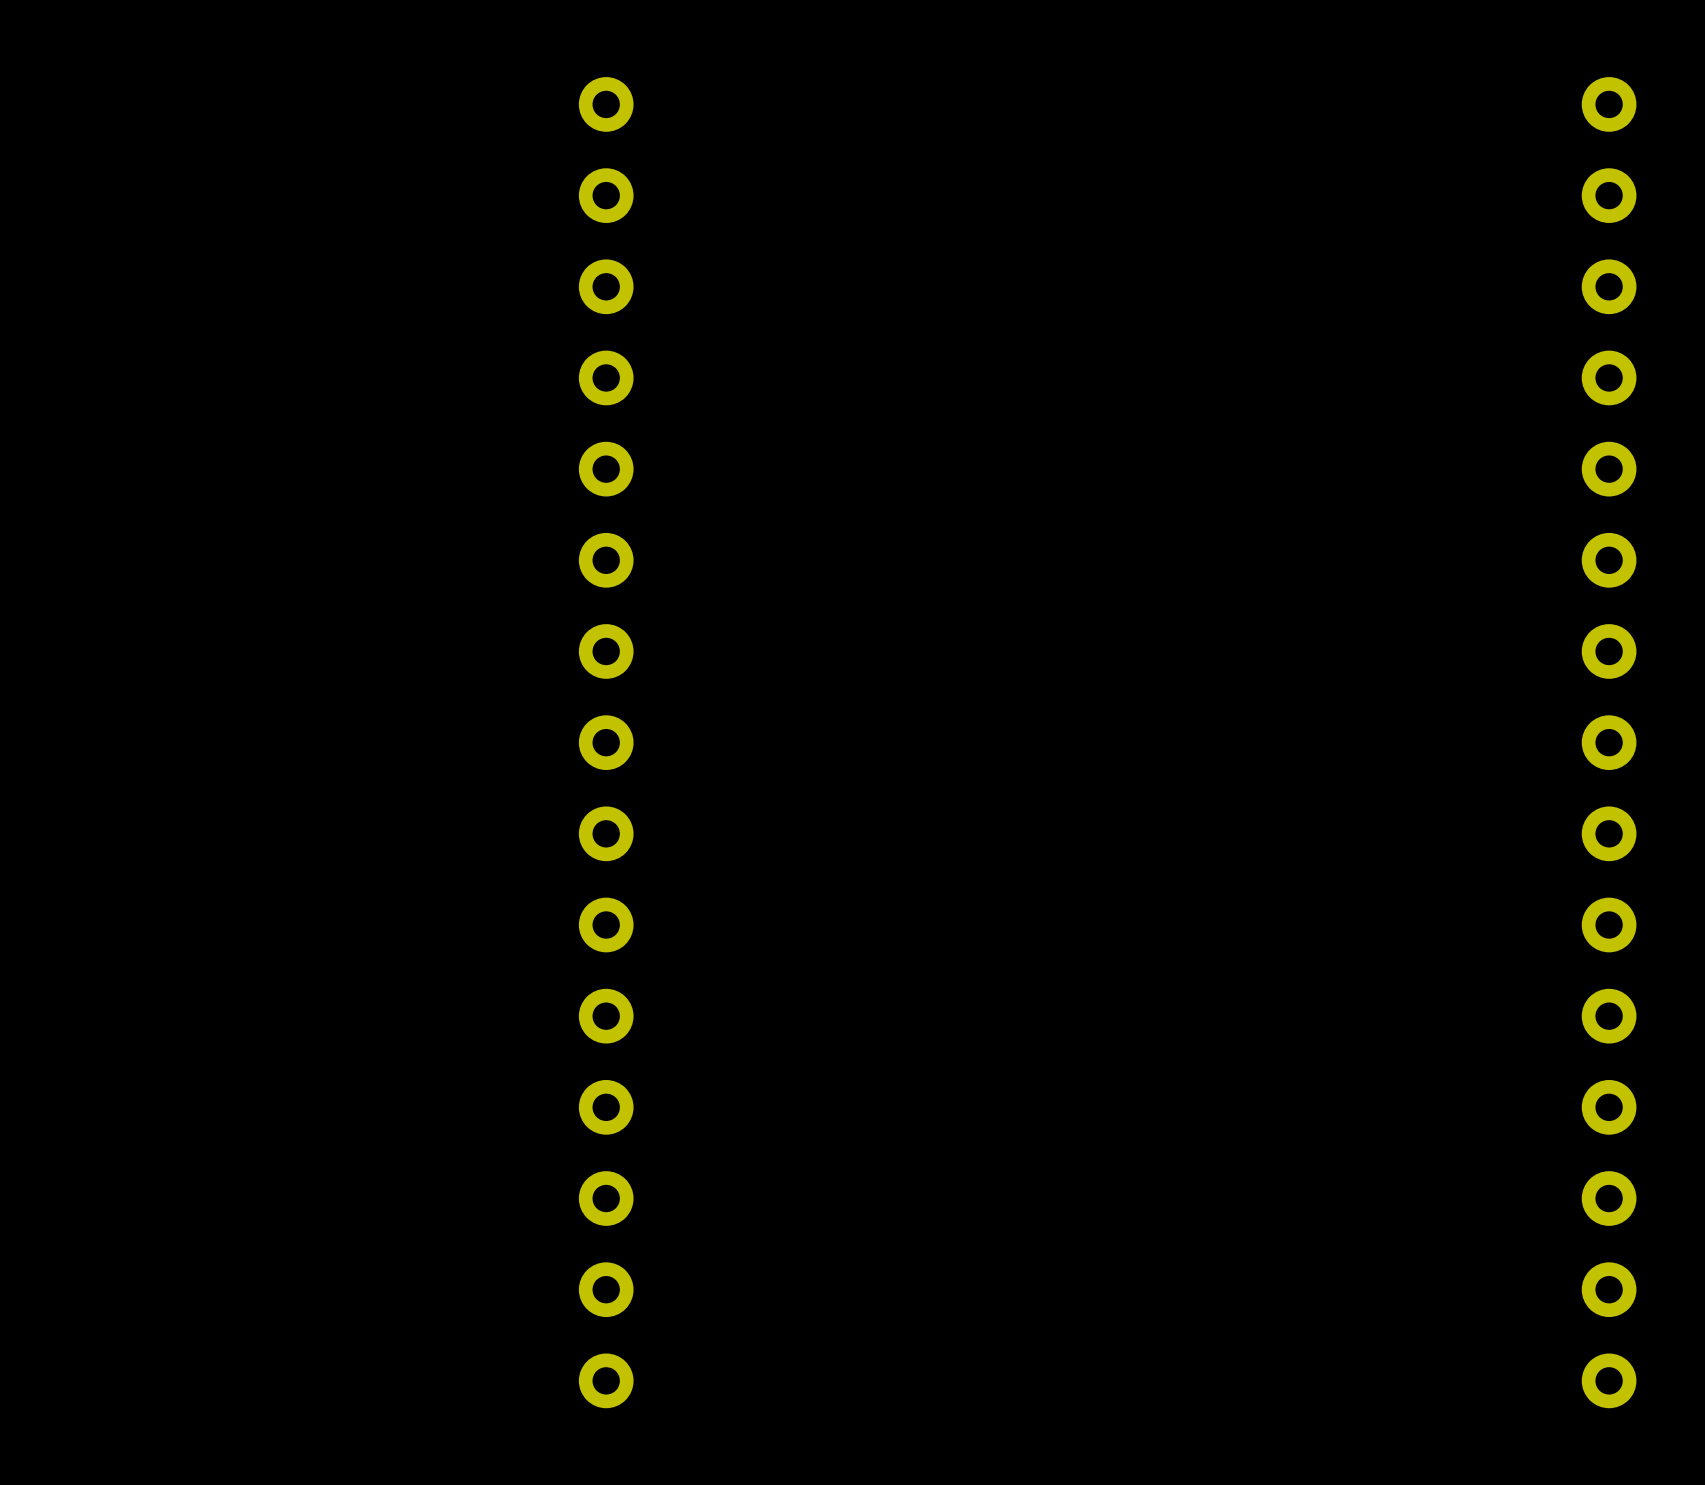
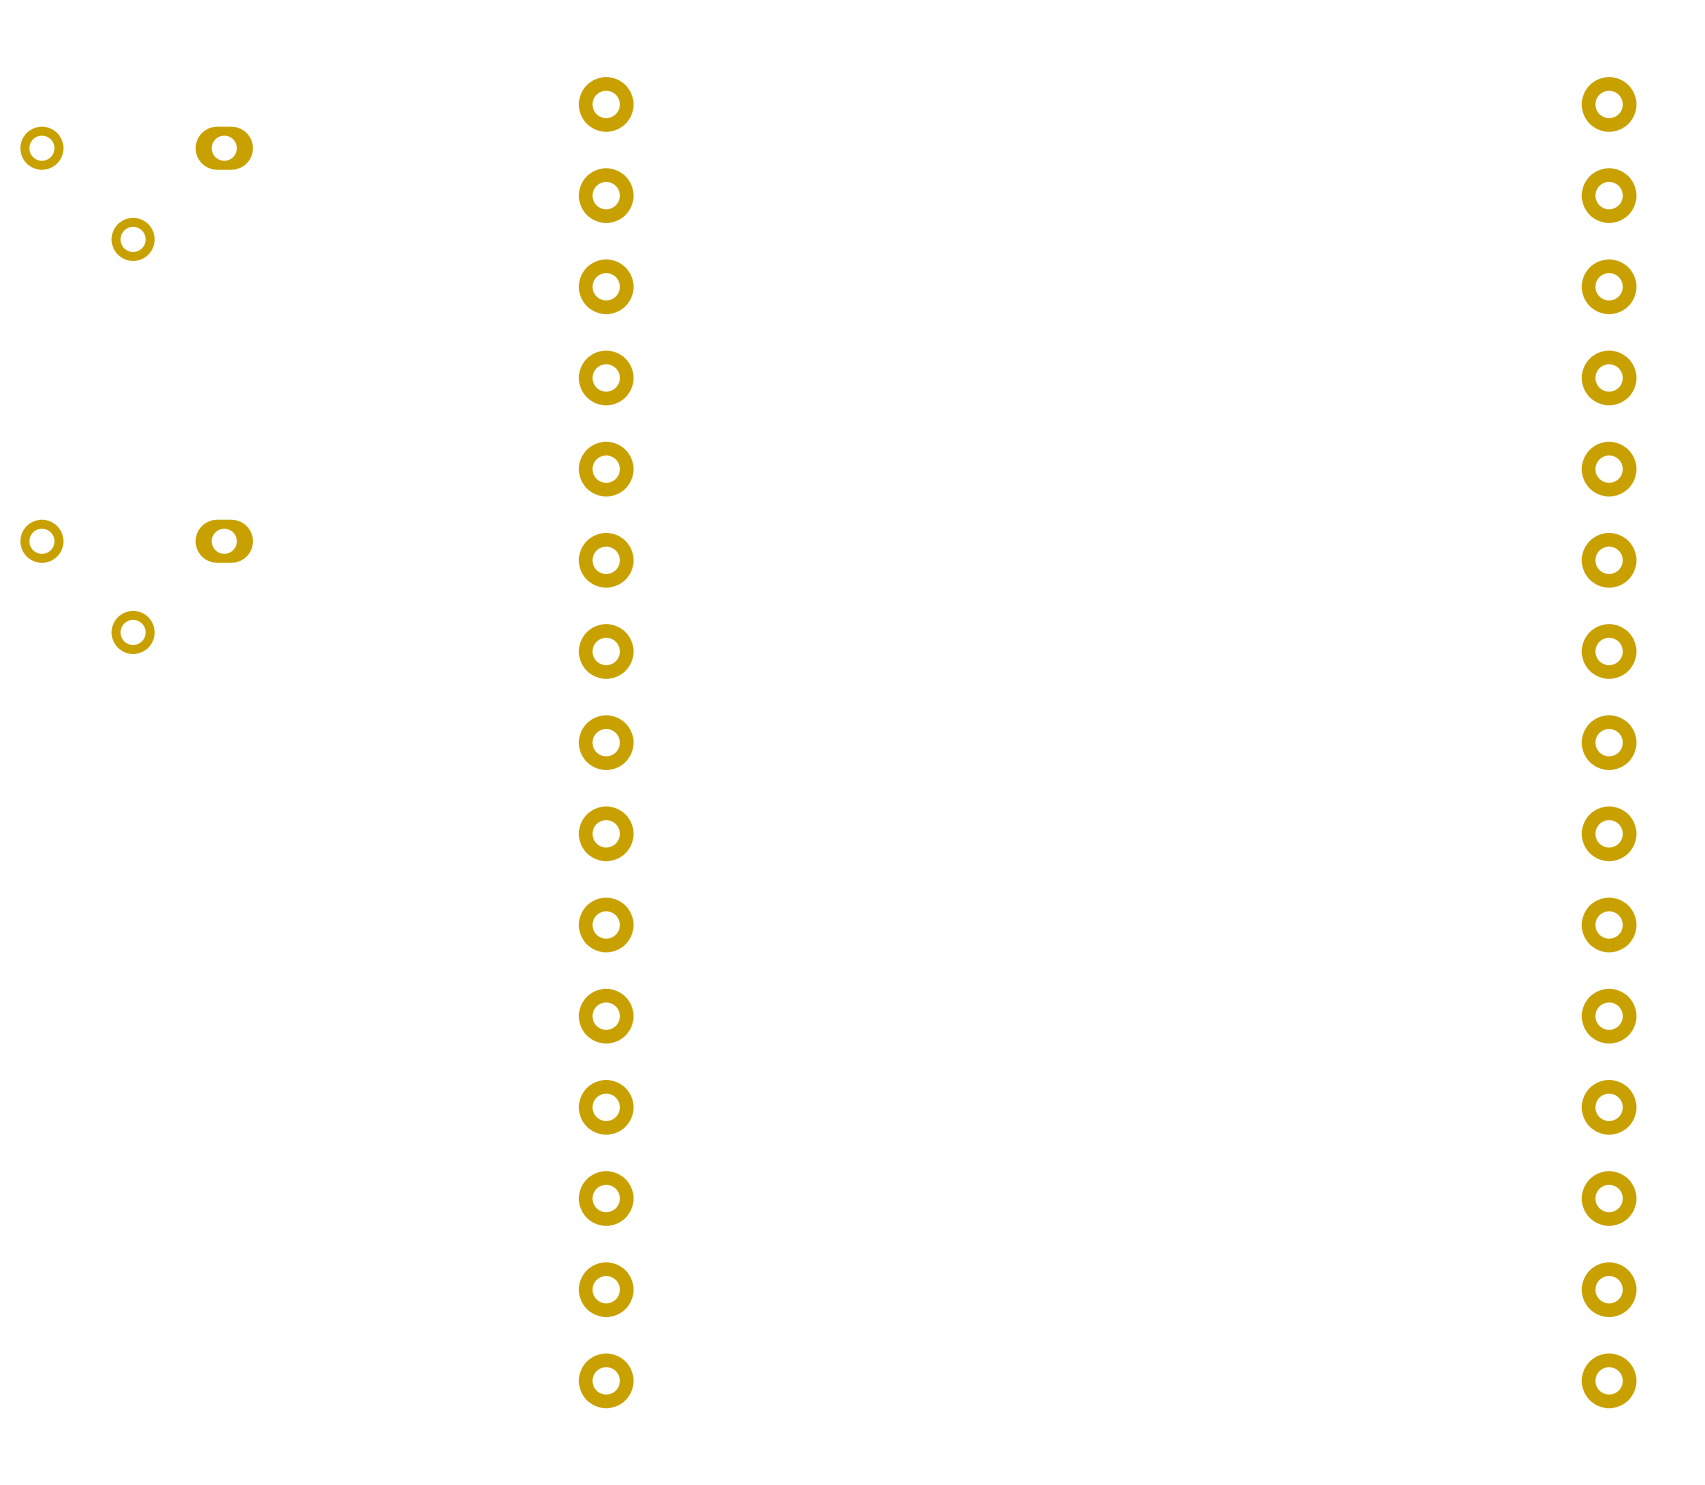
part: none -> (136, 193)
part: none -> (136, 586)

